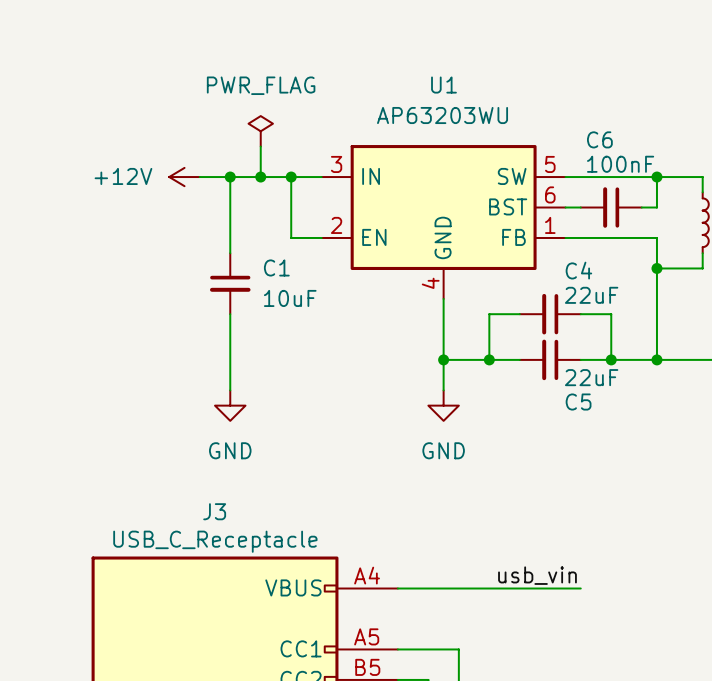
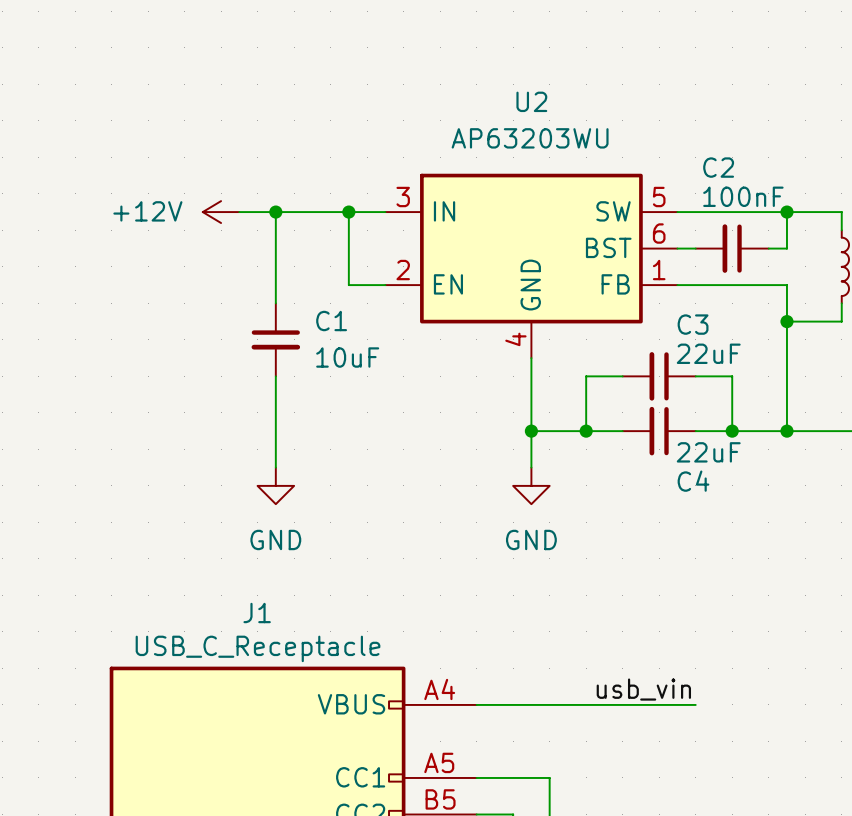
U1 name: U1 (443, 85) -> U2 (531, 101)
power symbol: PWR_FLAG (260, 131) -> none
C6 name: C6 (599, 139) -> C2 (718, 167)
wire: (260, 146) (260, 177) -> none
junction: (260, 177) -> none
C4 name: C4 (578, 270) -> C3 (693, 324)
C5 name: C5 (578, 402) -> C4 (693, 481)
J3 name: J3 (214, 511) -> J1 (257, 613)

